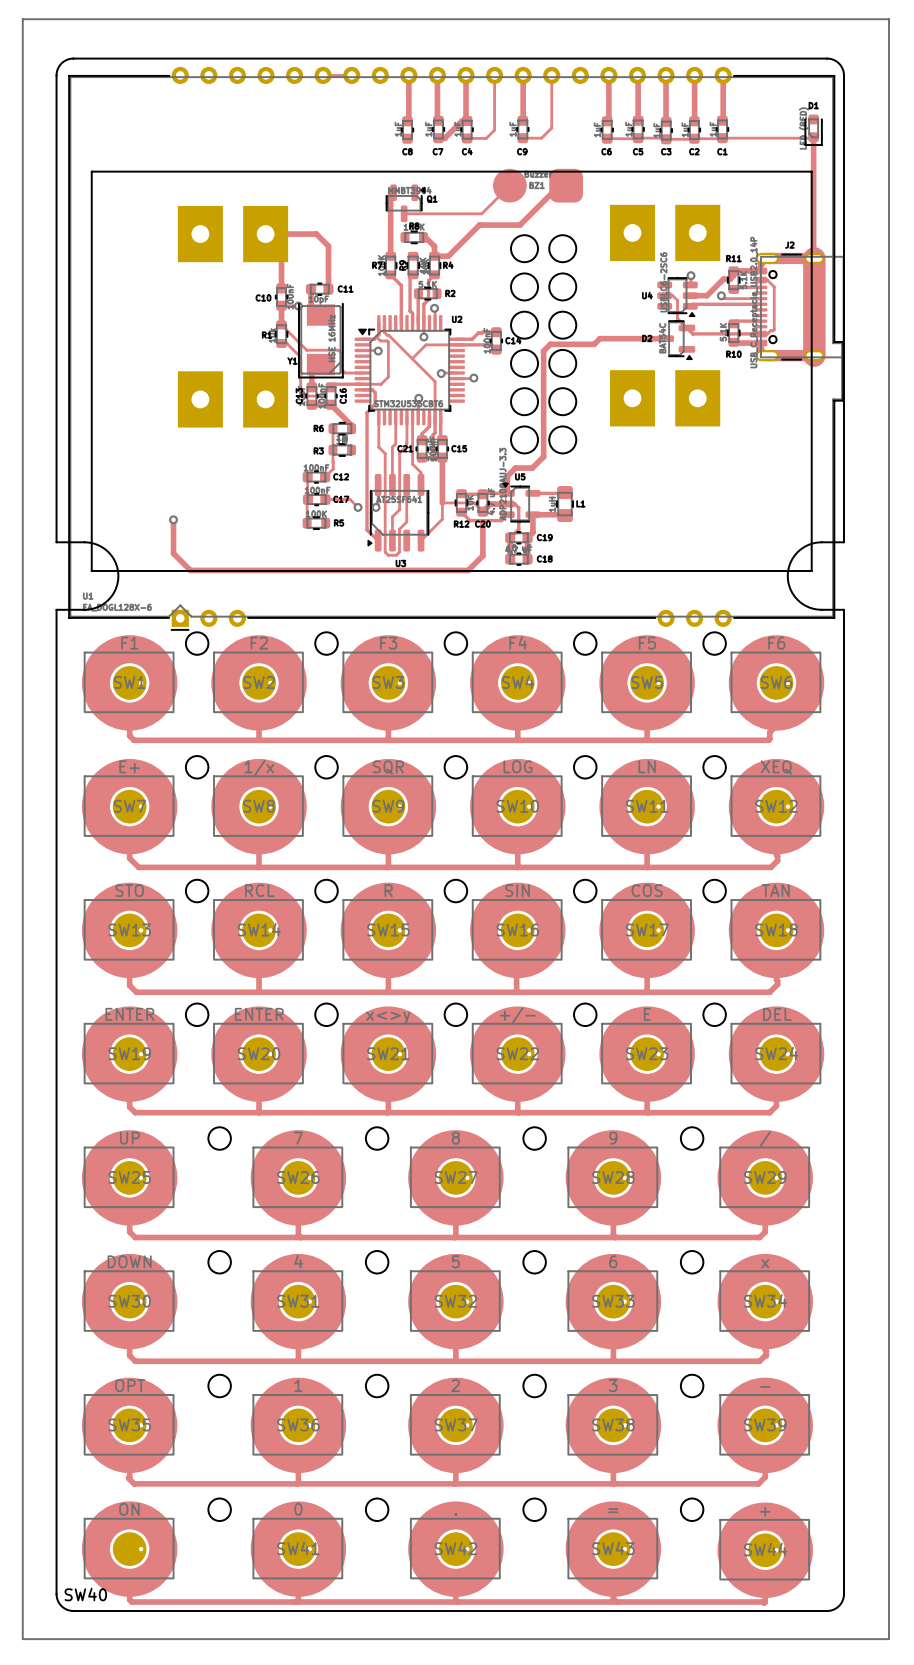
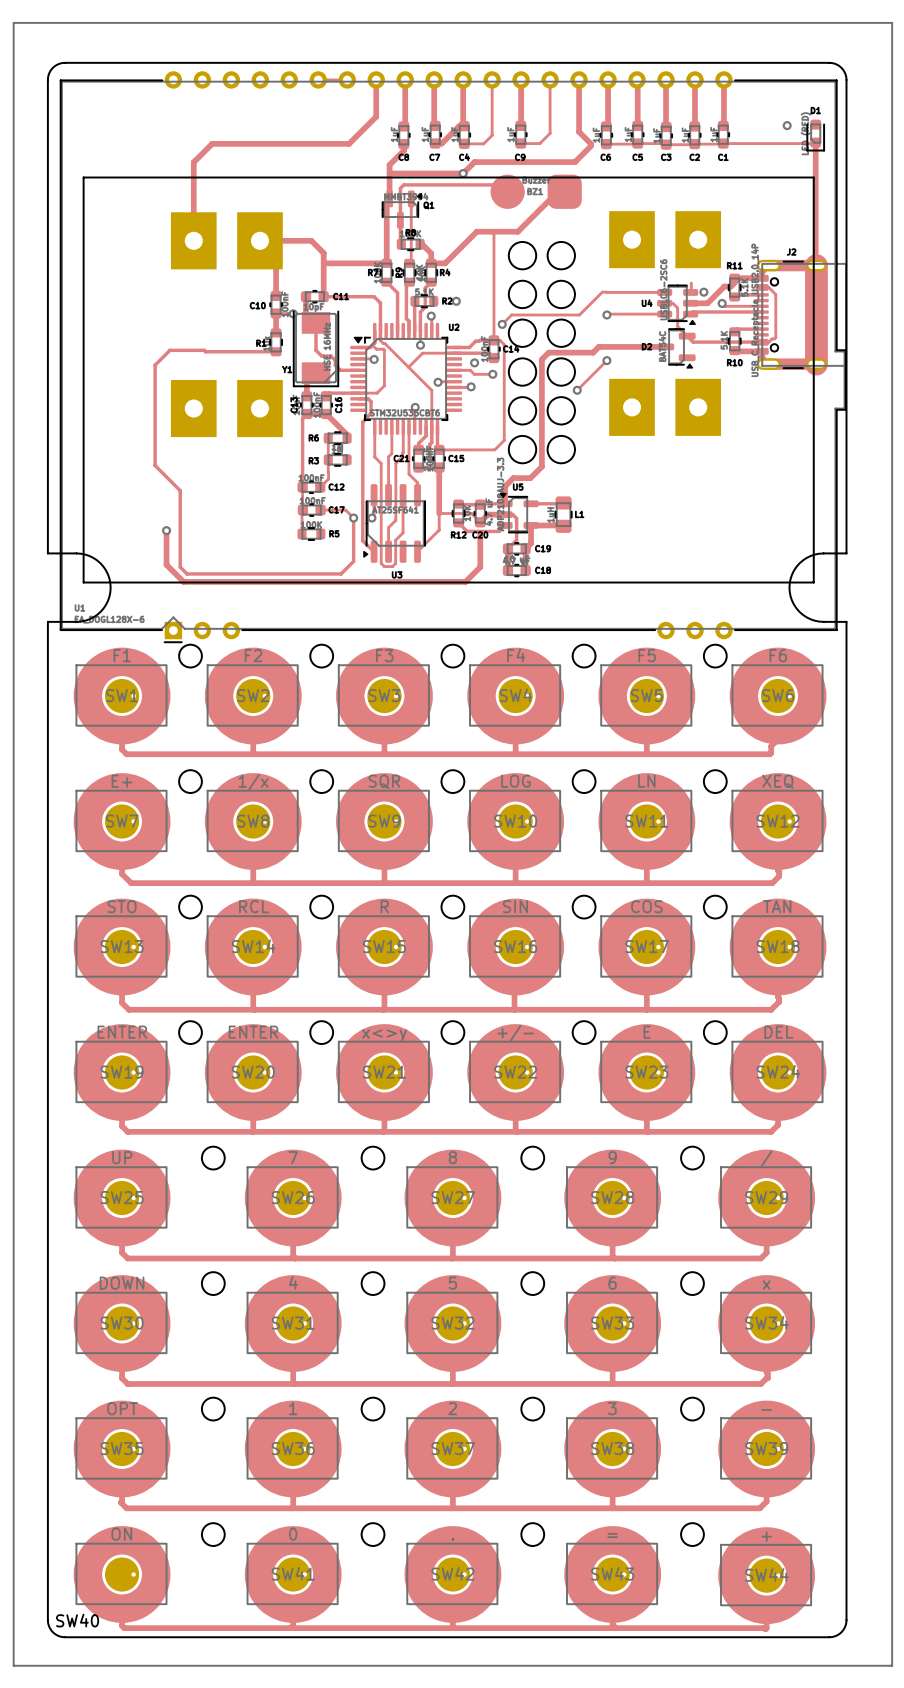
track: none -> (376, 79) (376, 116) (349, 143) (212, 143) (193, 162) (193, 240)
track: none -> (579, 79) (579, 131) (591, 145) (574, 162) (474, 162) (463, 173) (389, 173)
via: none -> (787, 125)
track: none -> (403, 144) (403, 150) (389, 164) (389, 198)
via: none -> (463, 173)
track: (509, 185) (481, 213) (404, 213) -> (507, 191) (500, 184) (403, 184) (400, 188) (401, 244)
track: none -> (411, 198) (411, 261) (409, 263)
track: none -> (492, 231) (493, 340) (499, 340) (504, 344) (504, 440) (494, 449) (439, 449)
track: none -> (323, 262) (386, 263)
via position: (691, 275) -> (703, 292)
track: none -> (664, 292) (602, 292) (579, 314) (511, 314) (502, 324)
track: none -> (323, 296) (374, 296) (380, 303) (380, 331)
via: none -> (456, 301)
track: none -> (664, 314) (606, 314)
via: none -> (606, 314)
track: none -> (316, 322) (316, 350) (321, 356) (330, 356) (340, 370) (358, 370)
via: none -> (502, 324)
track: (281, 324) (306, 350) (338, 350) (341, 352) (341, 369) (345, 372) (362, 372) -> none
track: (281, 343) (286, 343) (300, 357) (300, 393) (302, 396) (320, 396) (329, 387) -> (276, 351) (169, 350) (155, 365) (155, 465) (180, 490) (180, 567) (187, 573) (341, 573) (353, 561) (353, 518)
track: none -> (606, 360) (577, 390)
via: none -> (606, 360)
via: none -> (474, 362)
track: none -> (453, 370) (470, 370) (474, 374) (492, 374)
via: none -> (492, 374)
via: none -> (577, 390)
track: none -> (306, 413) (302, 418) (302, 487)

